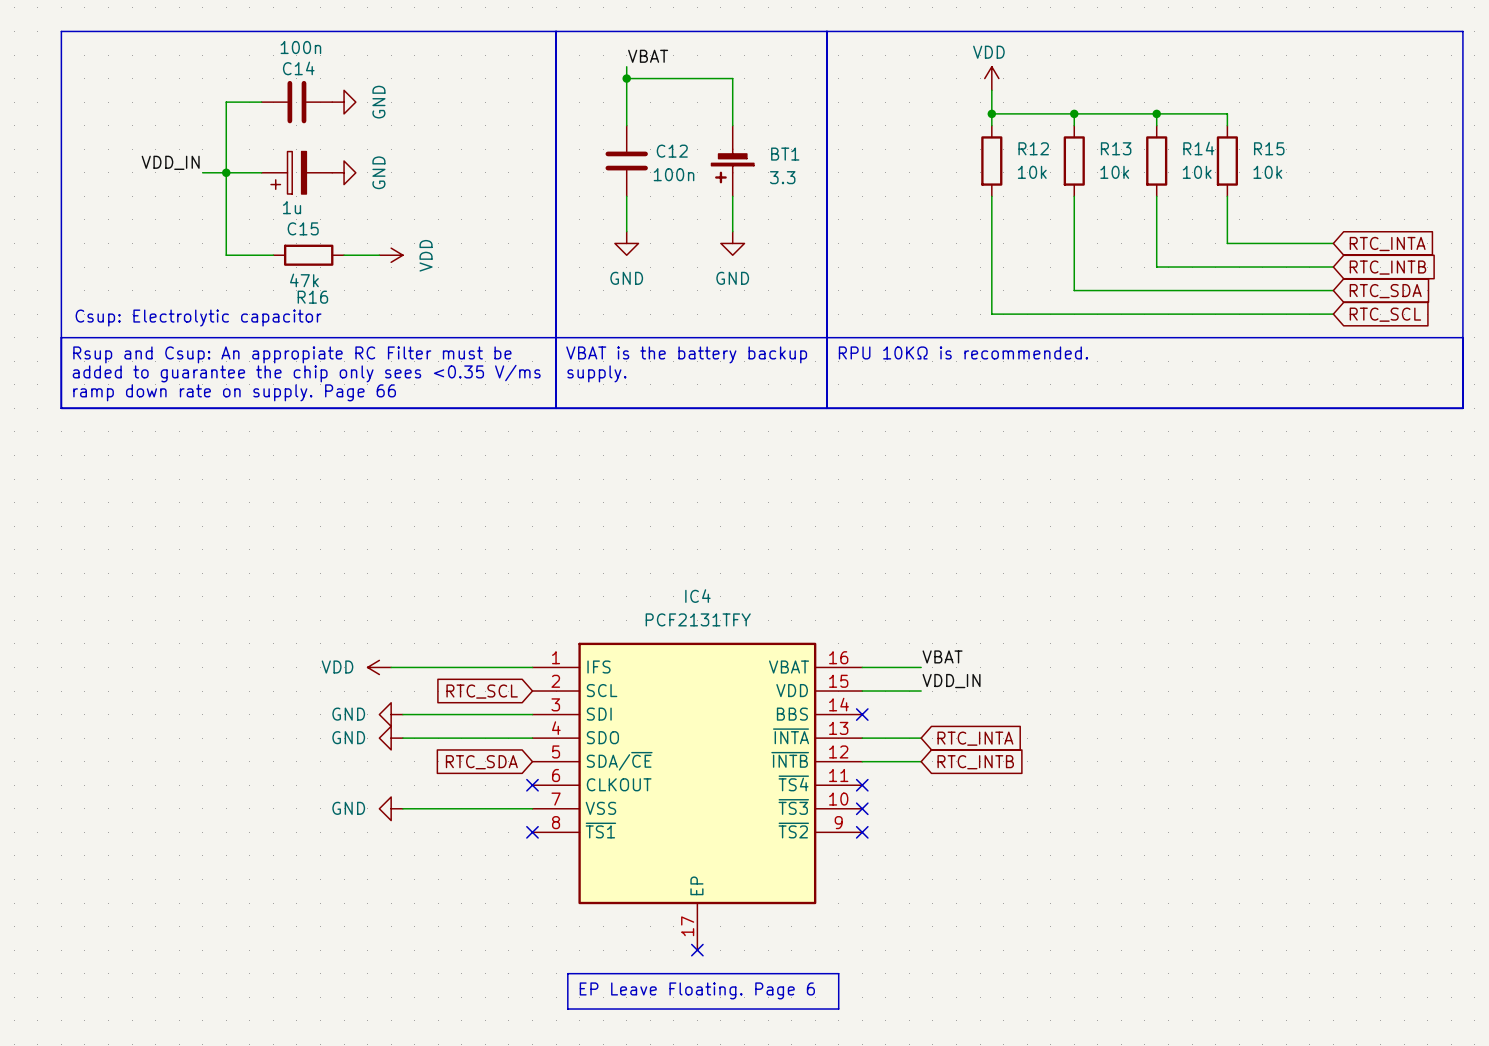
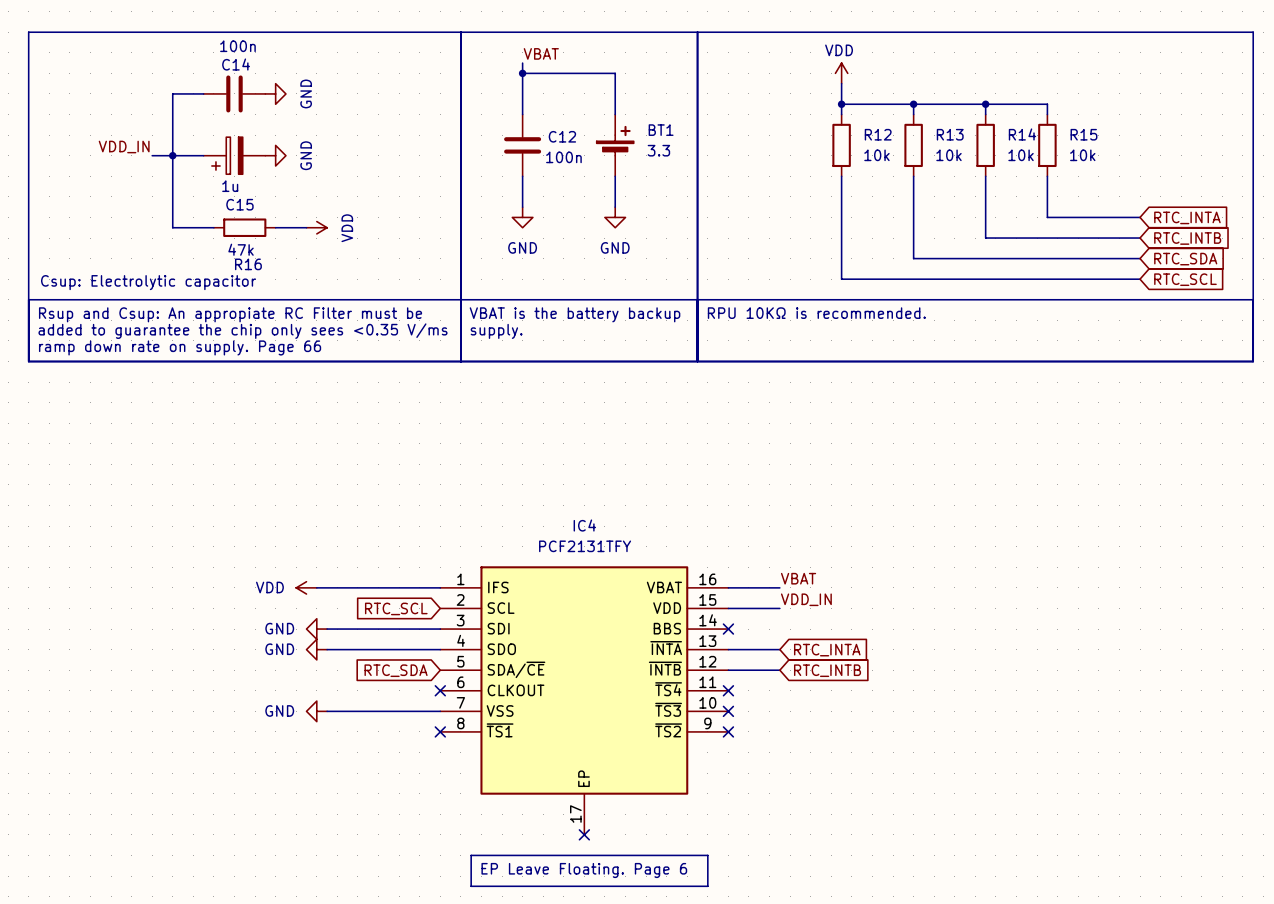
BT1 rotation: 0° (732, 166) -> 180° (615, 140)

